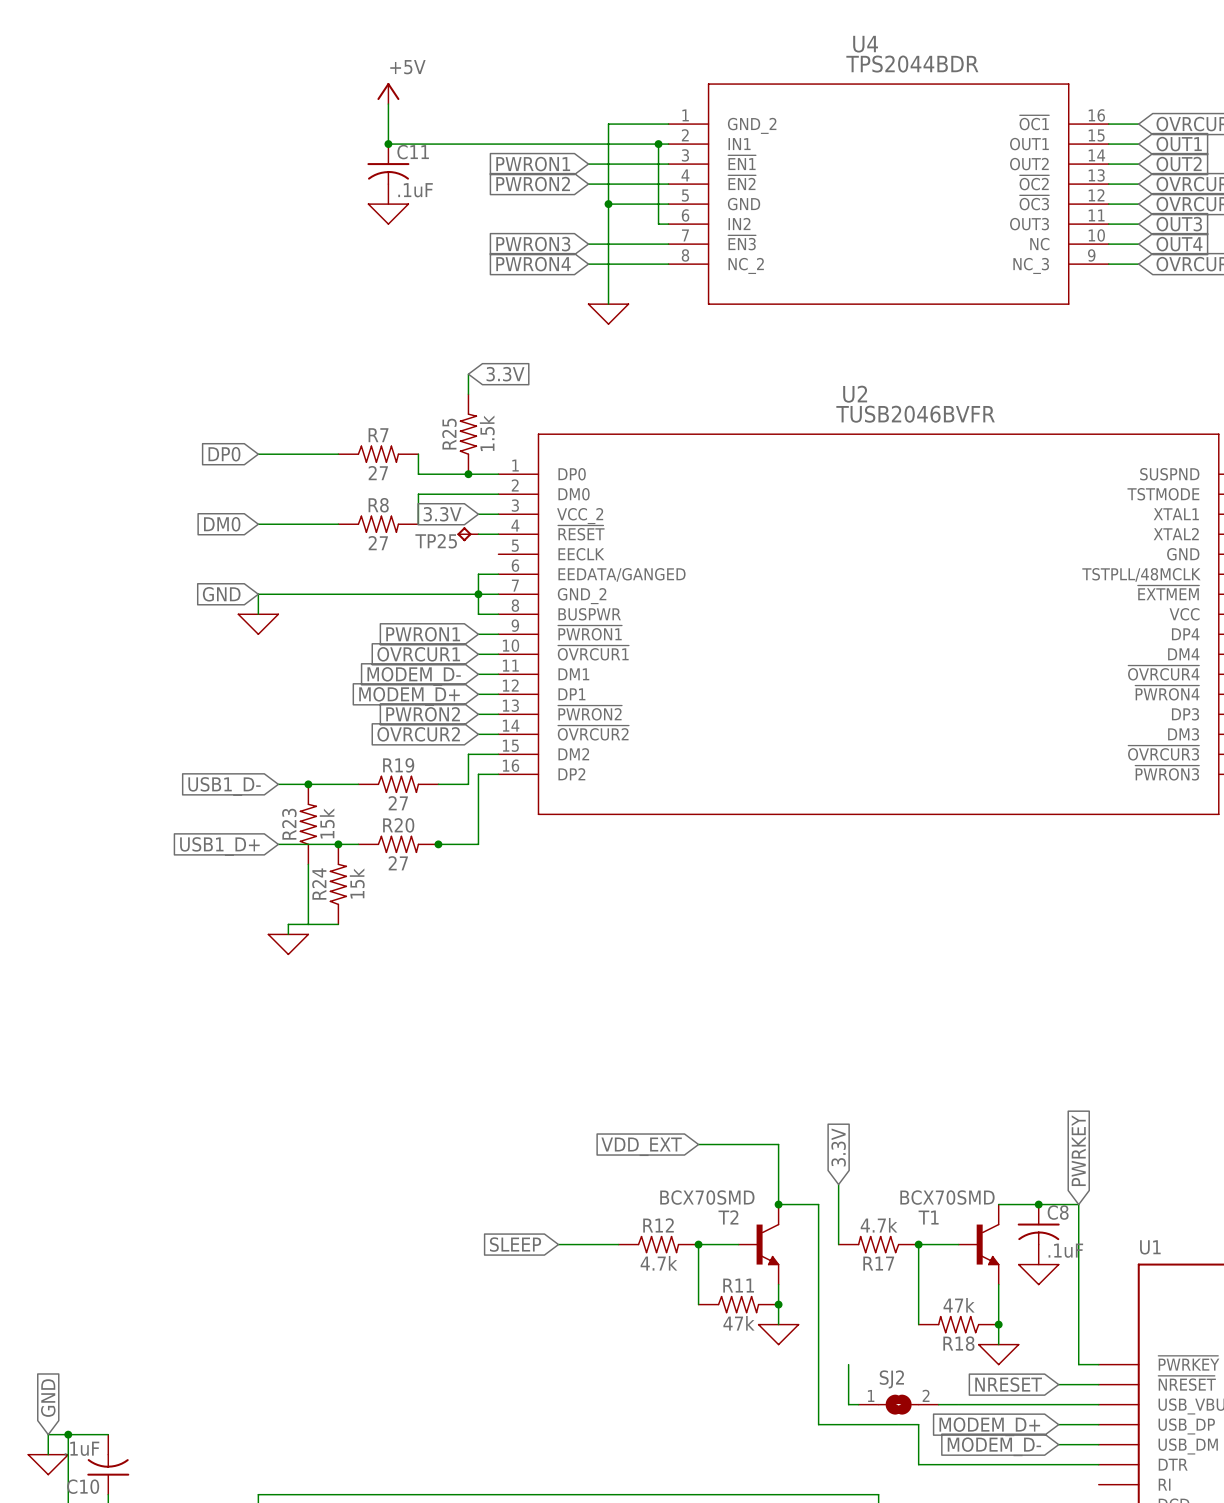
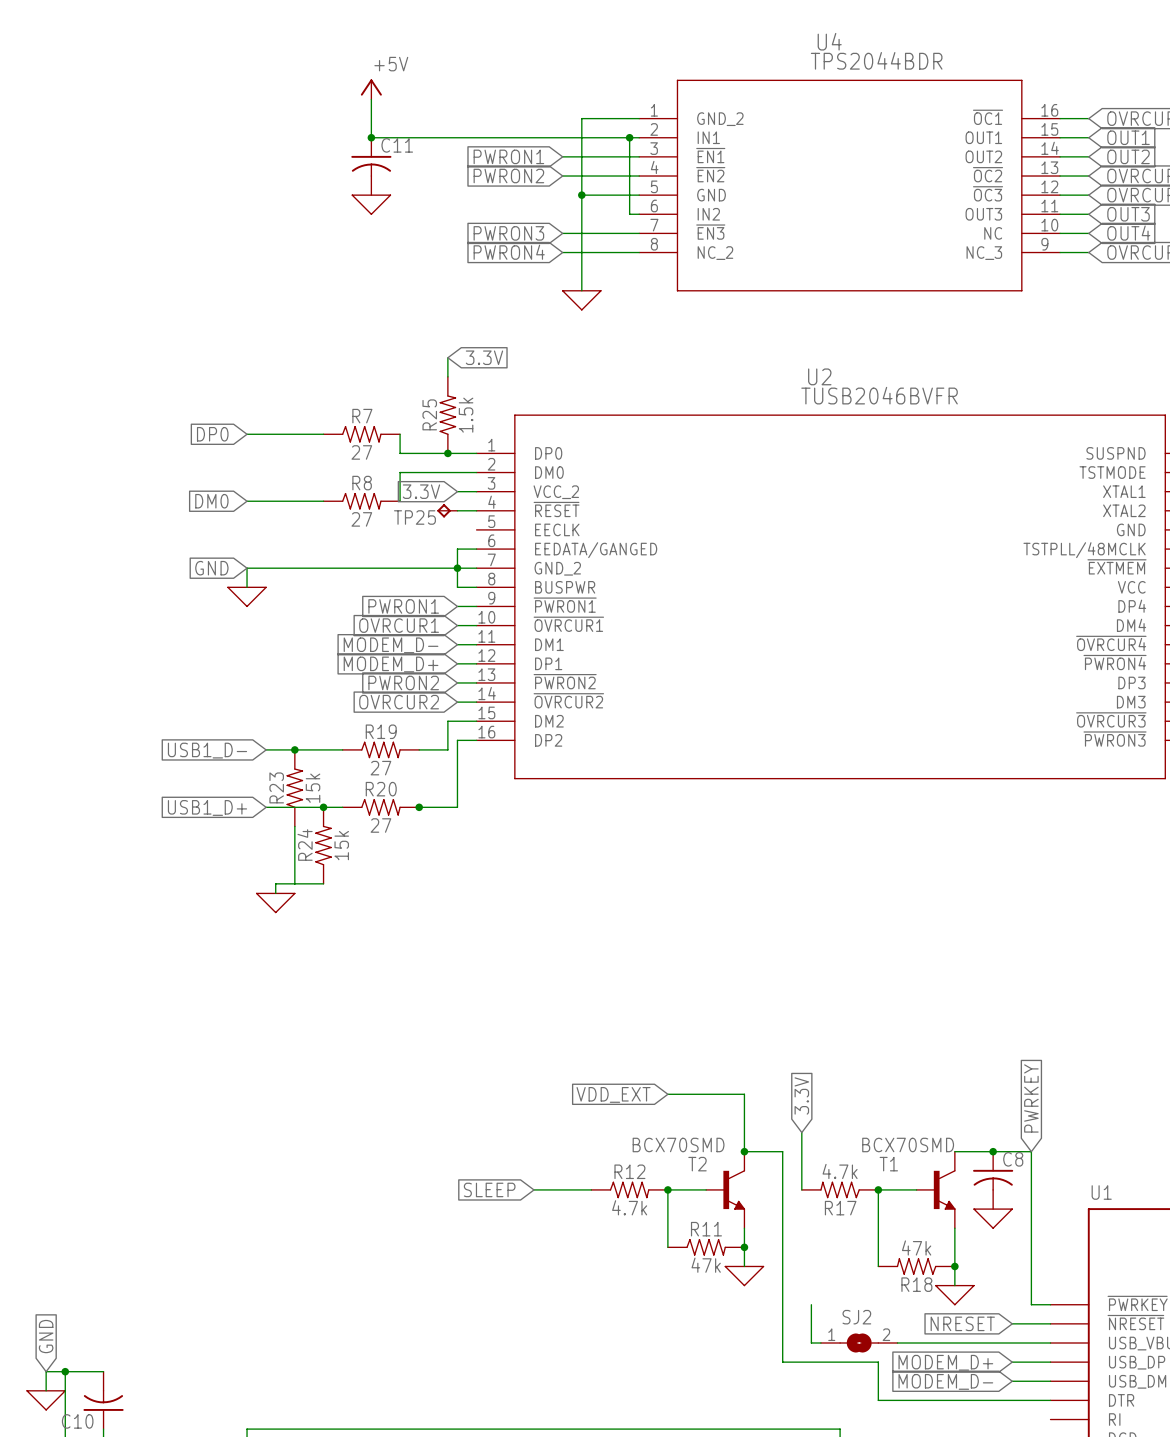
C11 value: .1uF (415, 190) -> none
C8 value: .1uF (1065, 1250) -> none
C10 value: .1uF (82, 1448) -> none

